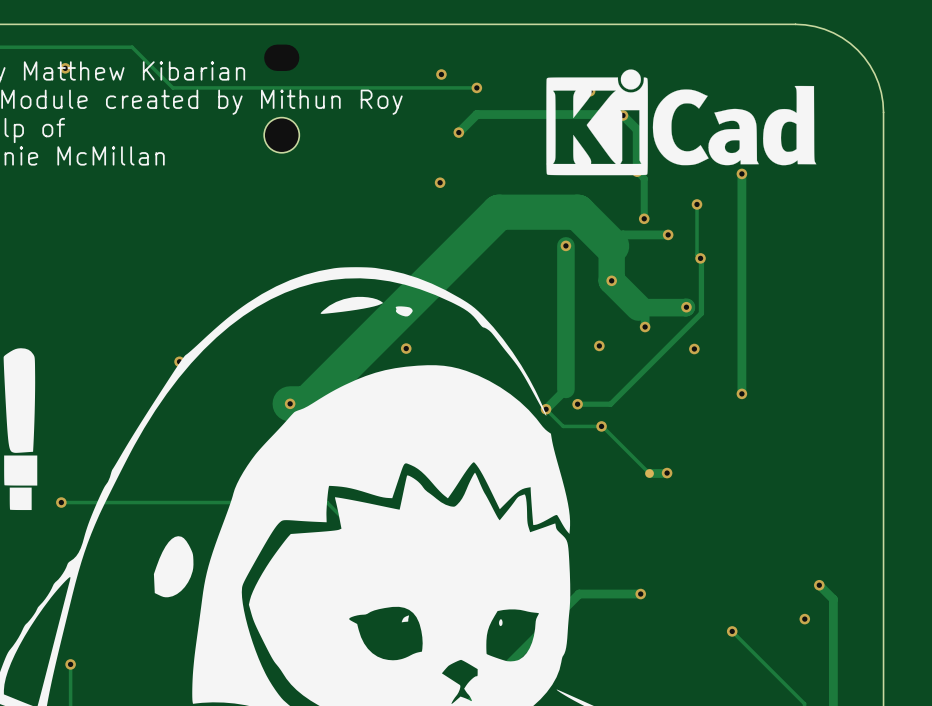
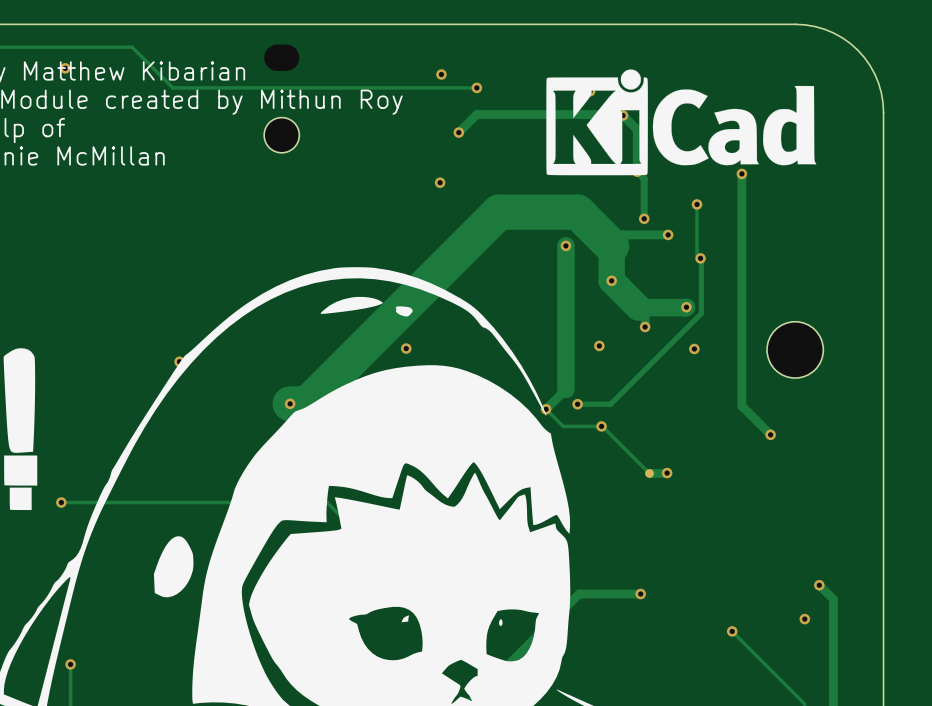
part: none -> (795, 349)
track: none -> (741, 393) (741, 406) (770, 434)
via position: (741, 393) -> (770, 434)

